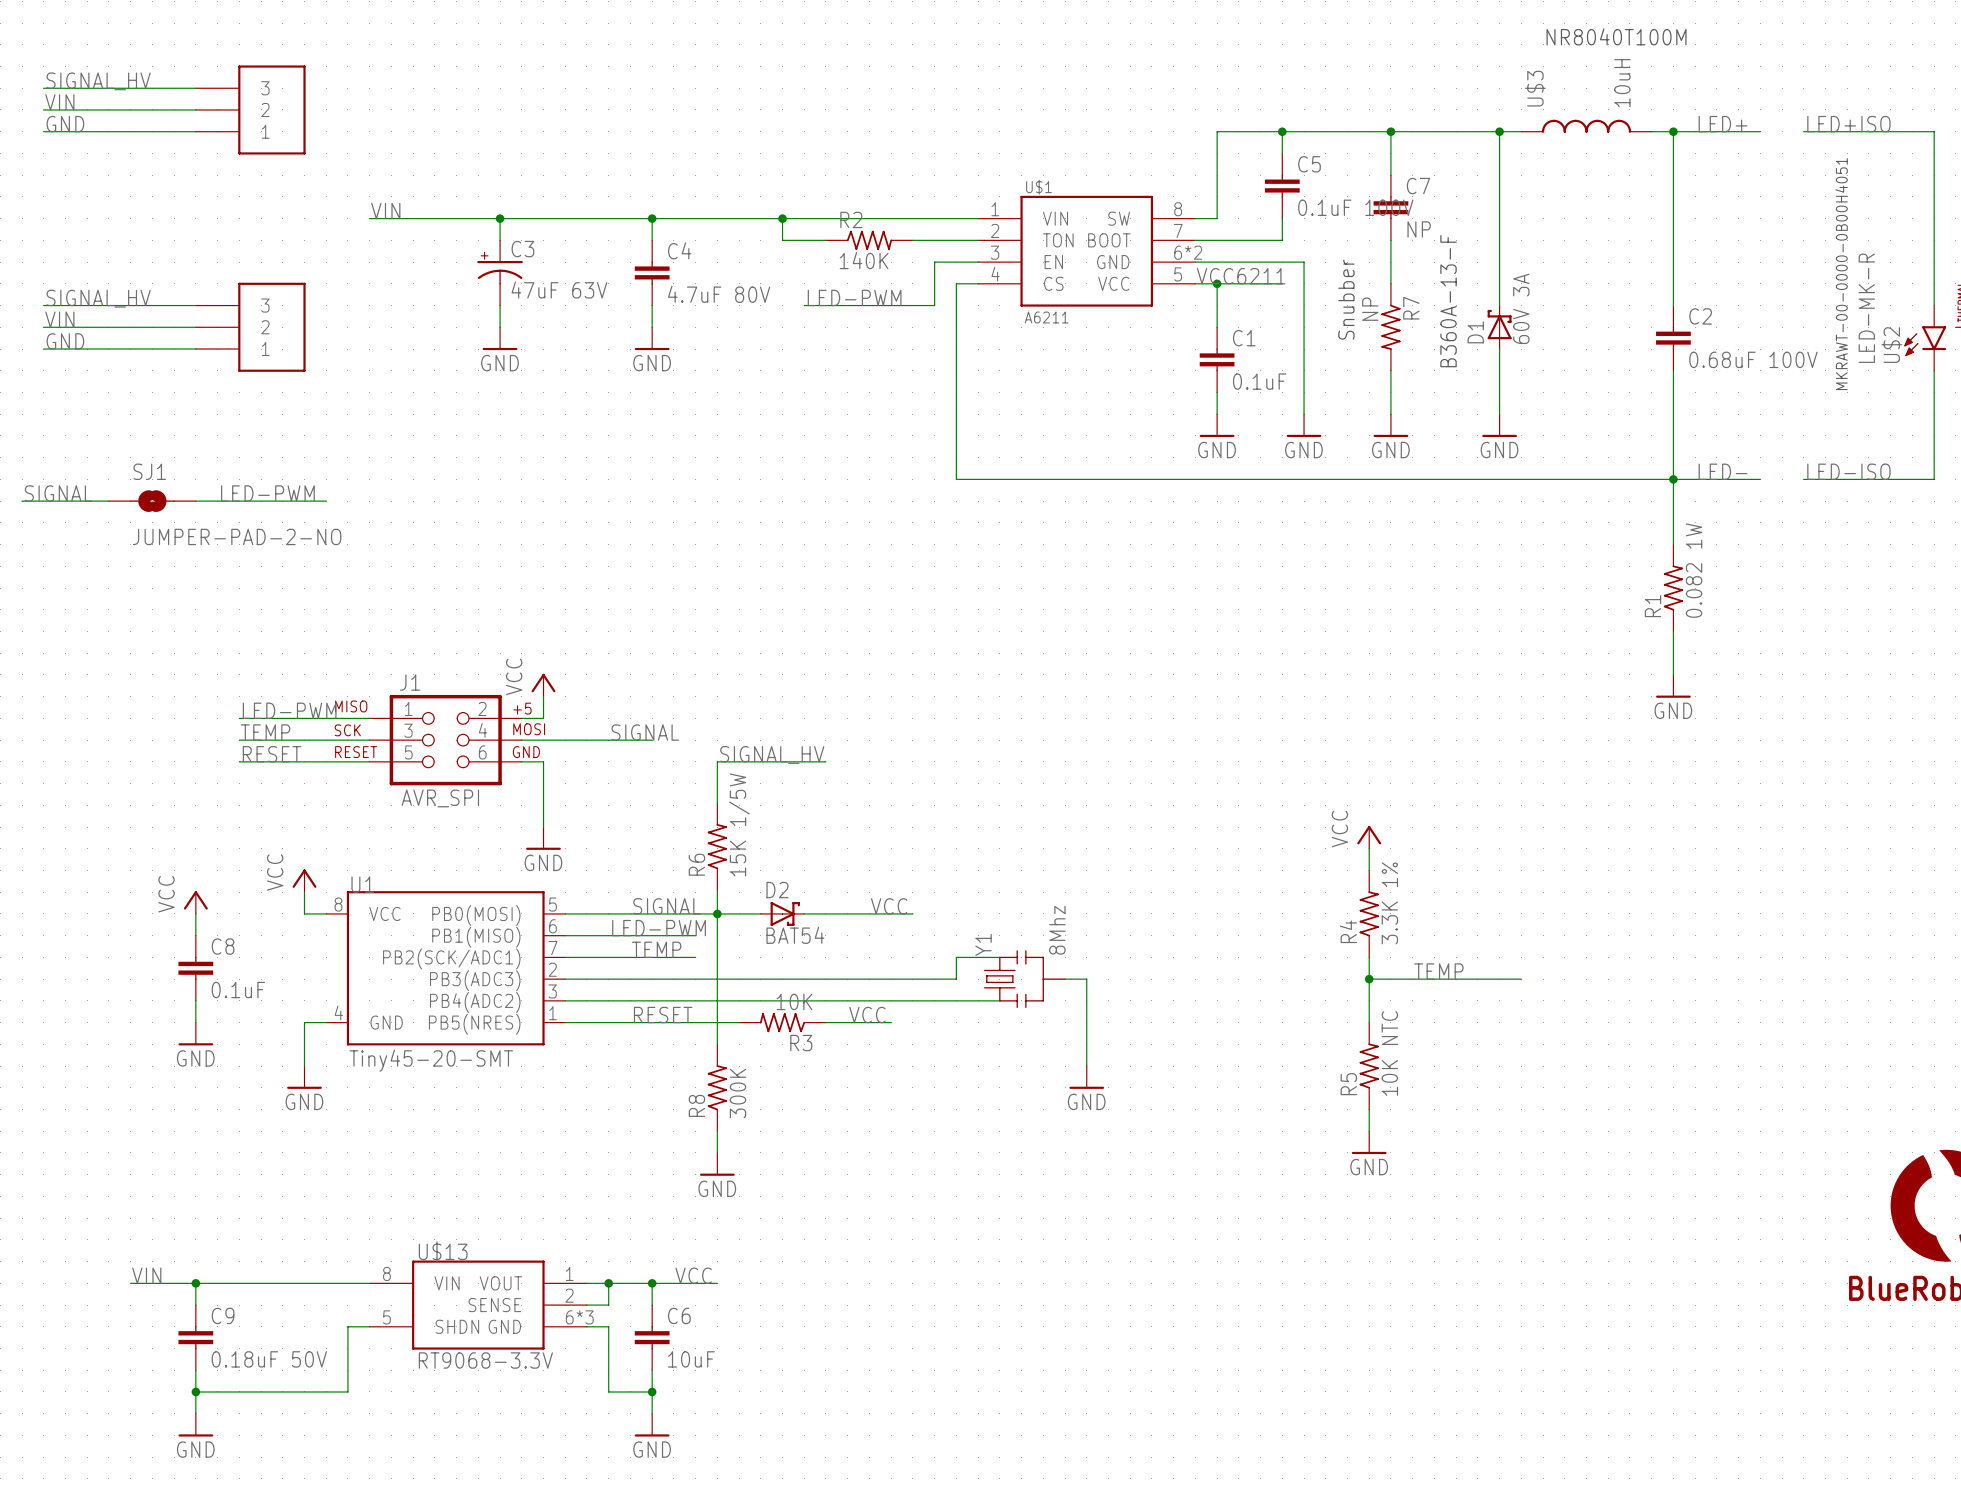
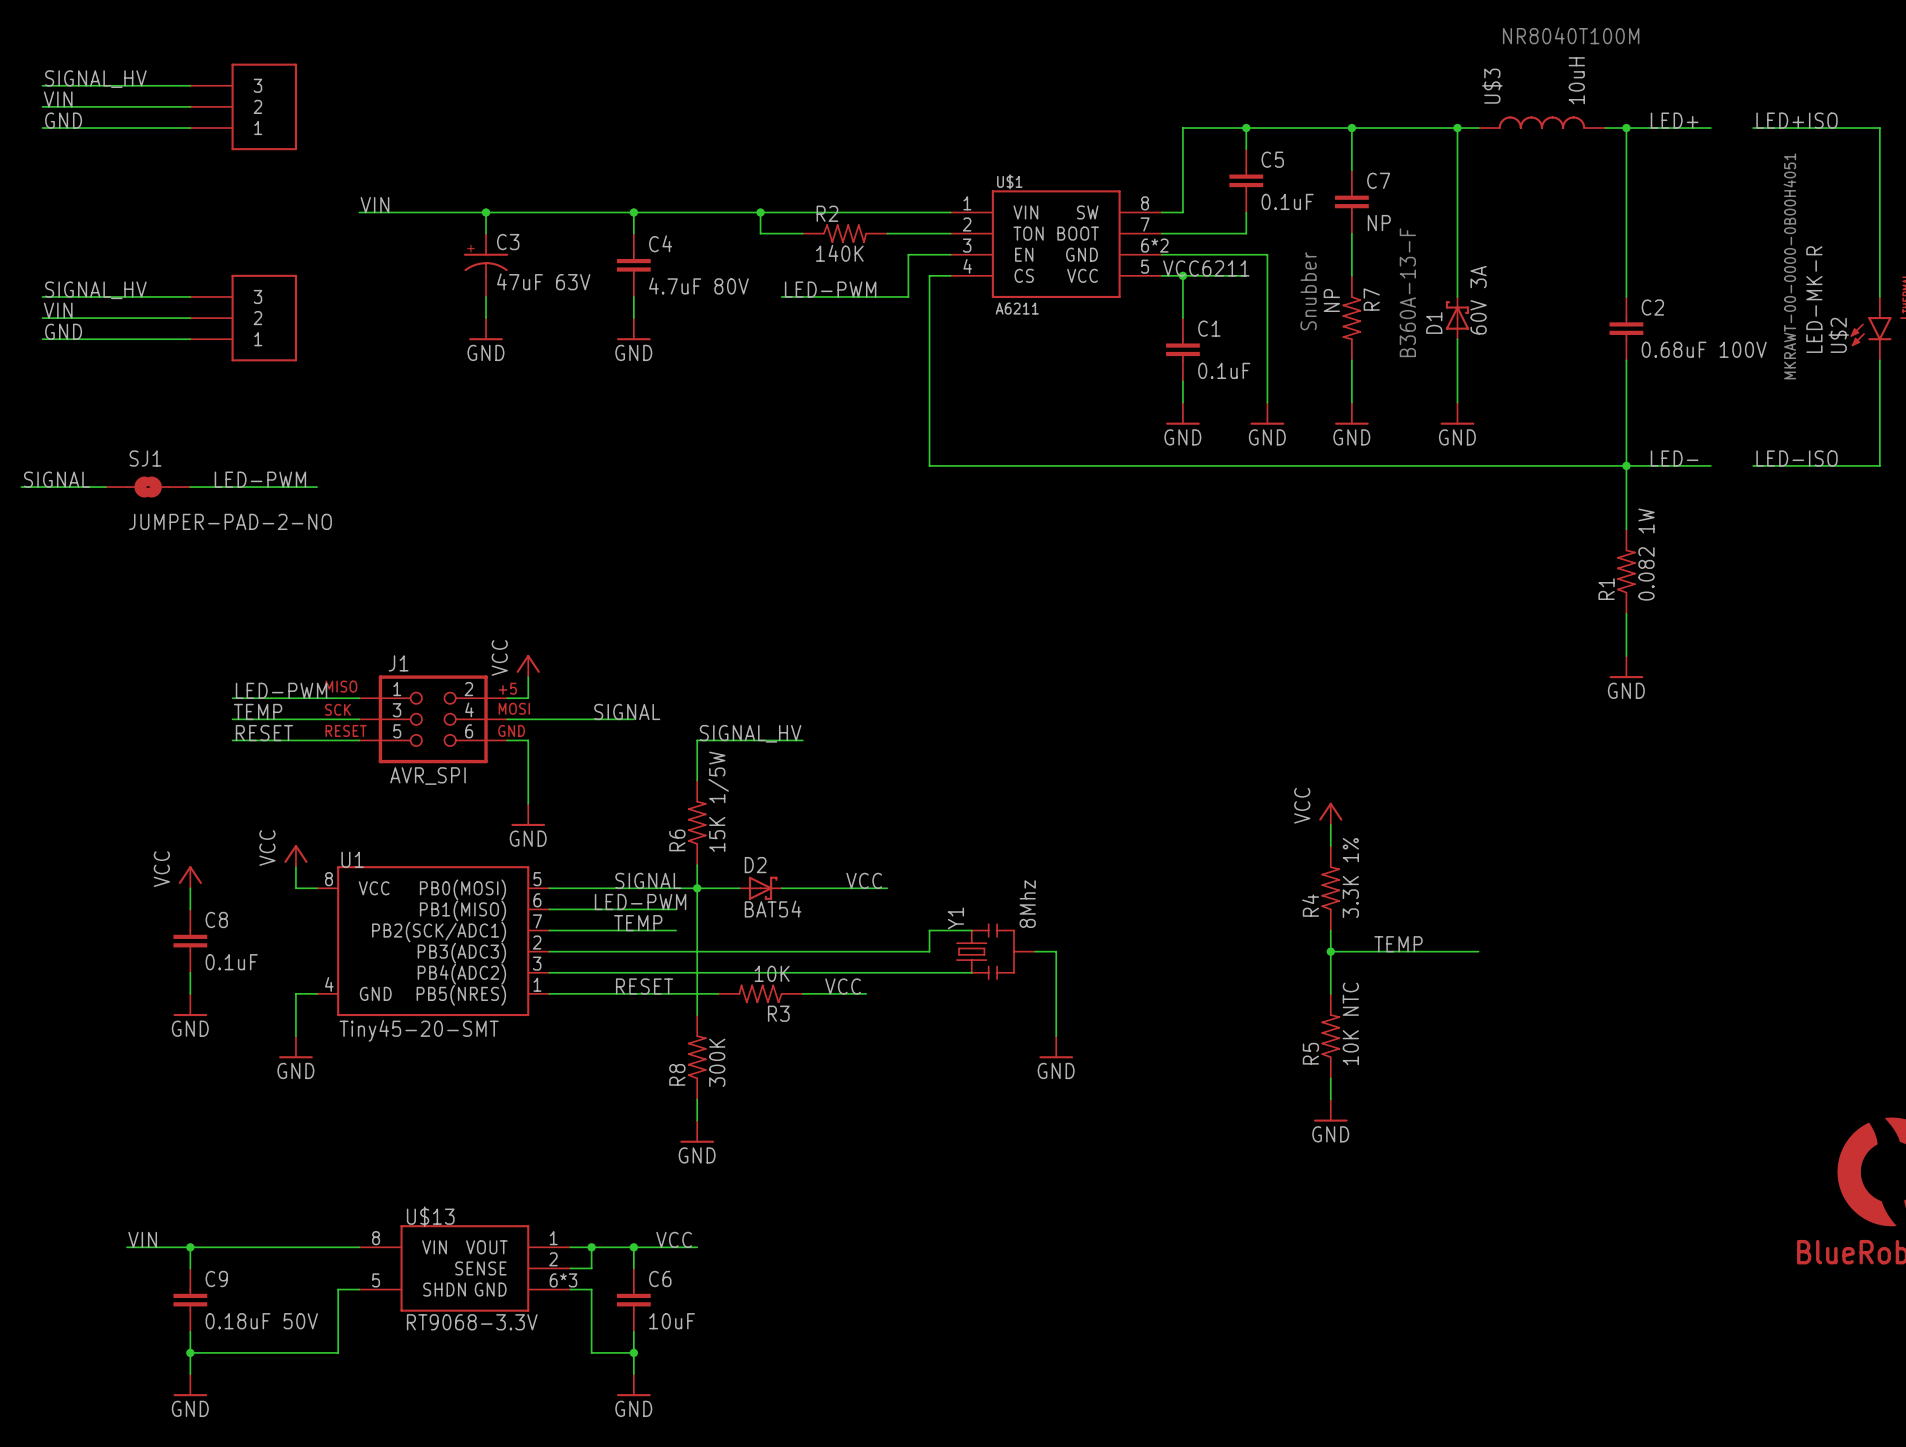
C5 value: 0.1uF 100V (1355, 207) -> 0.1uF (1287, 201)

